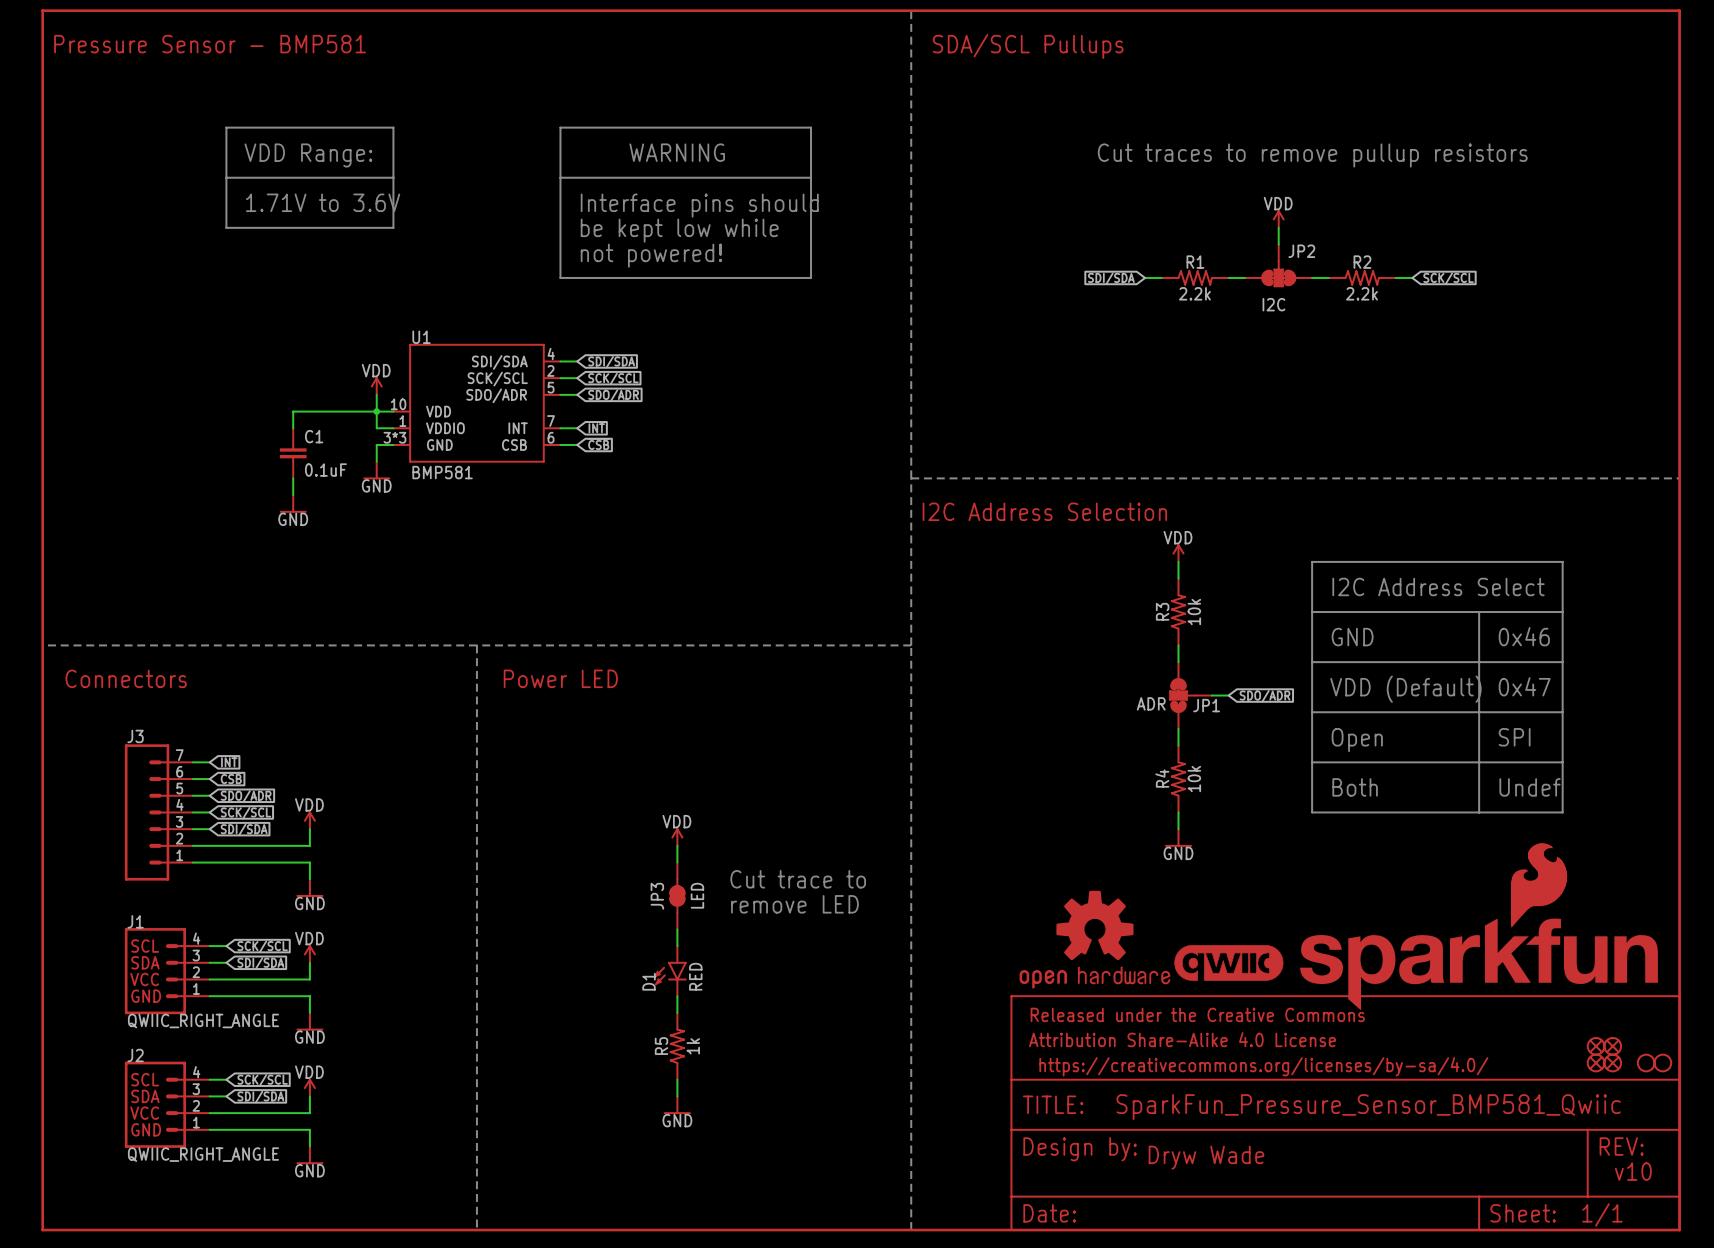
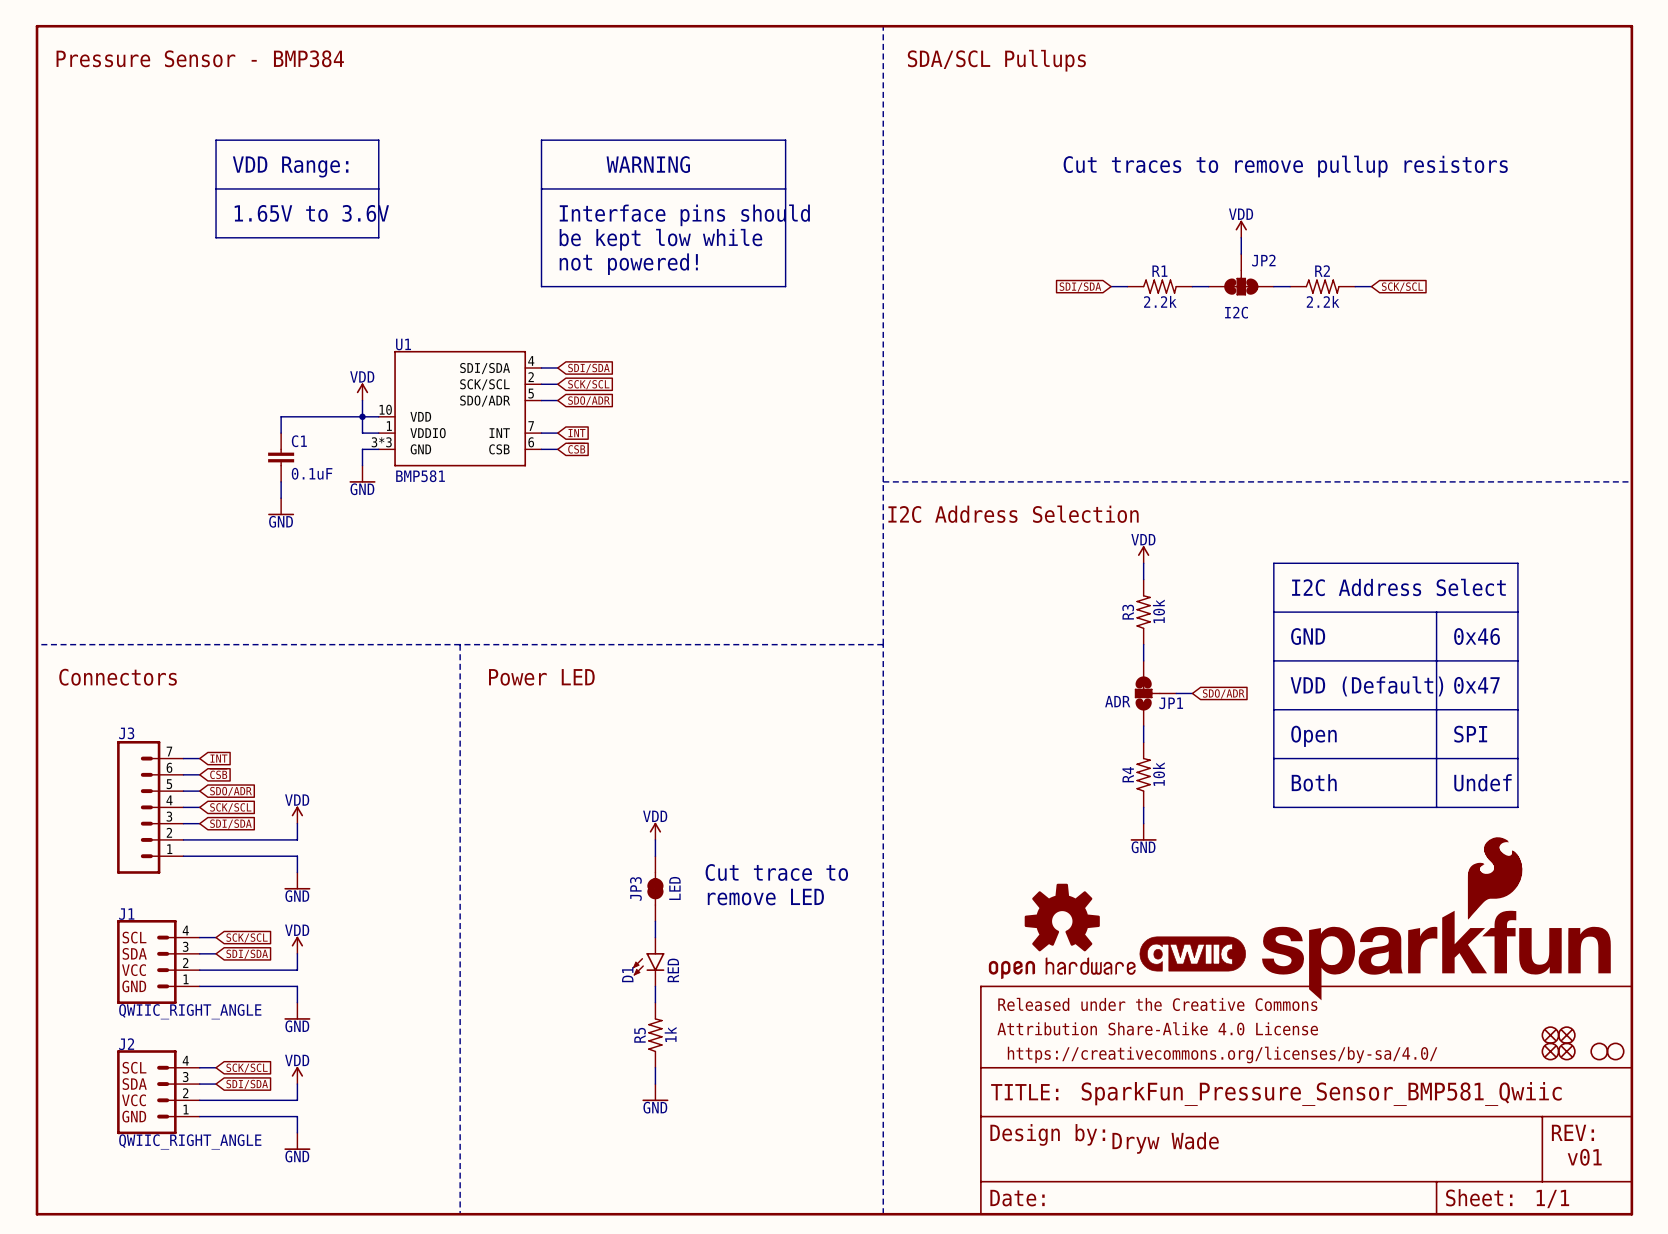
text: Pressure Sensor - BMP581 (210, 44) -> Pressure Sensor - BMP384 (200, 58)
text: 1.71V to 3.6V (323, 202) -> 1.65V to 3.6V (311, 213)
text: v10 (1633, 1171) -> v01 (1584, 1157)

